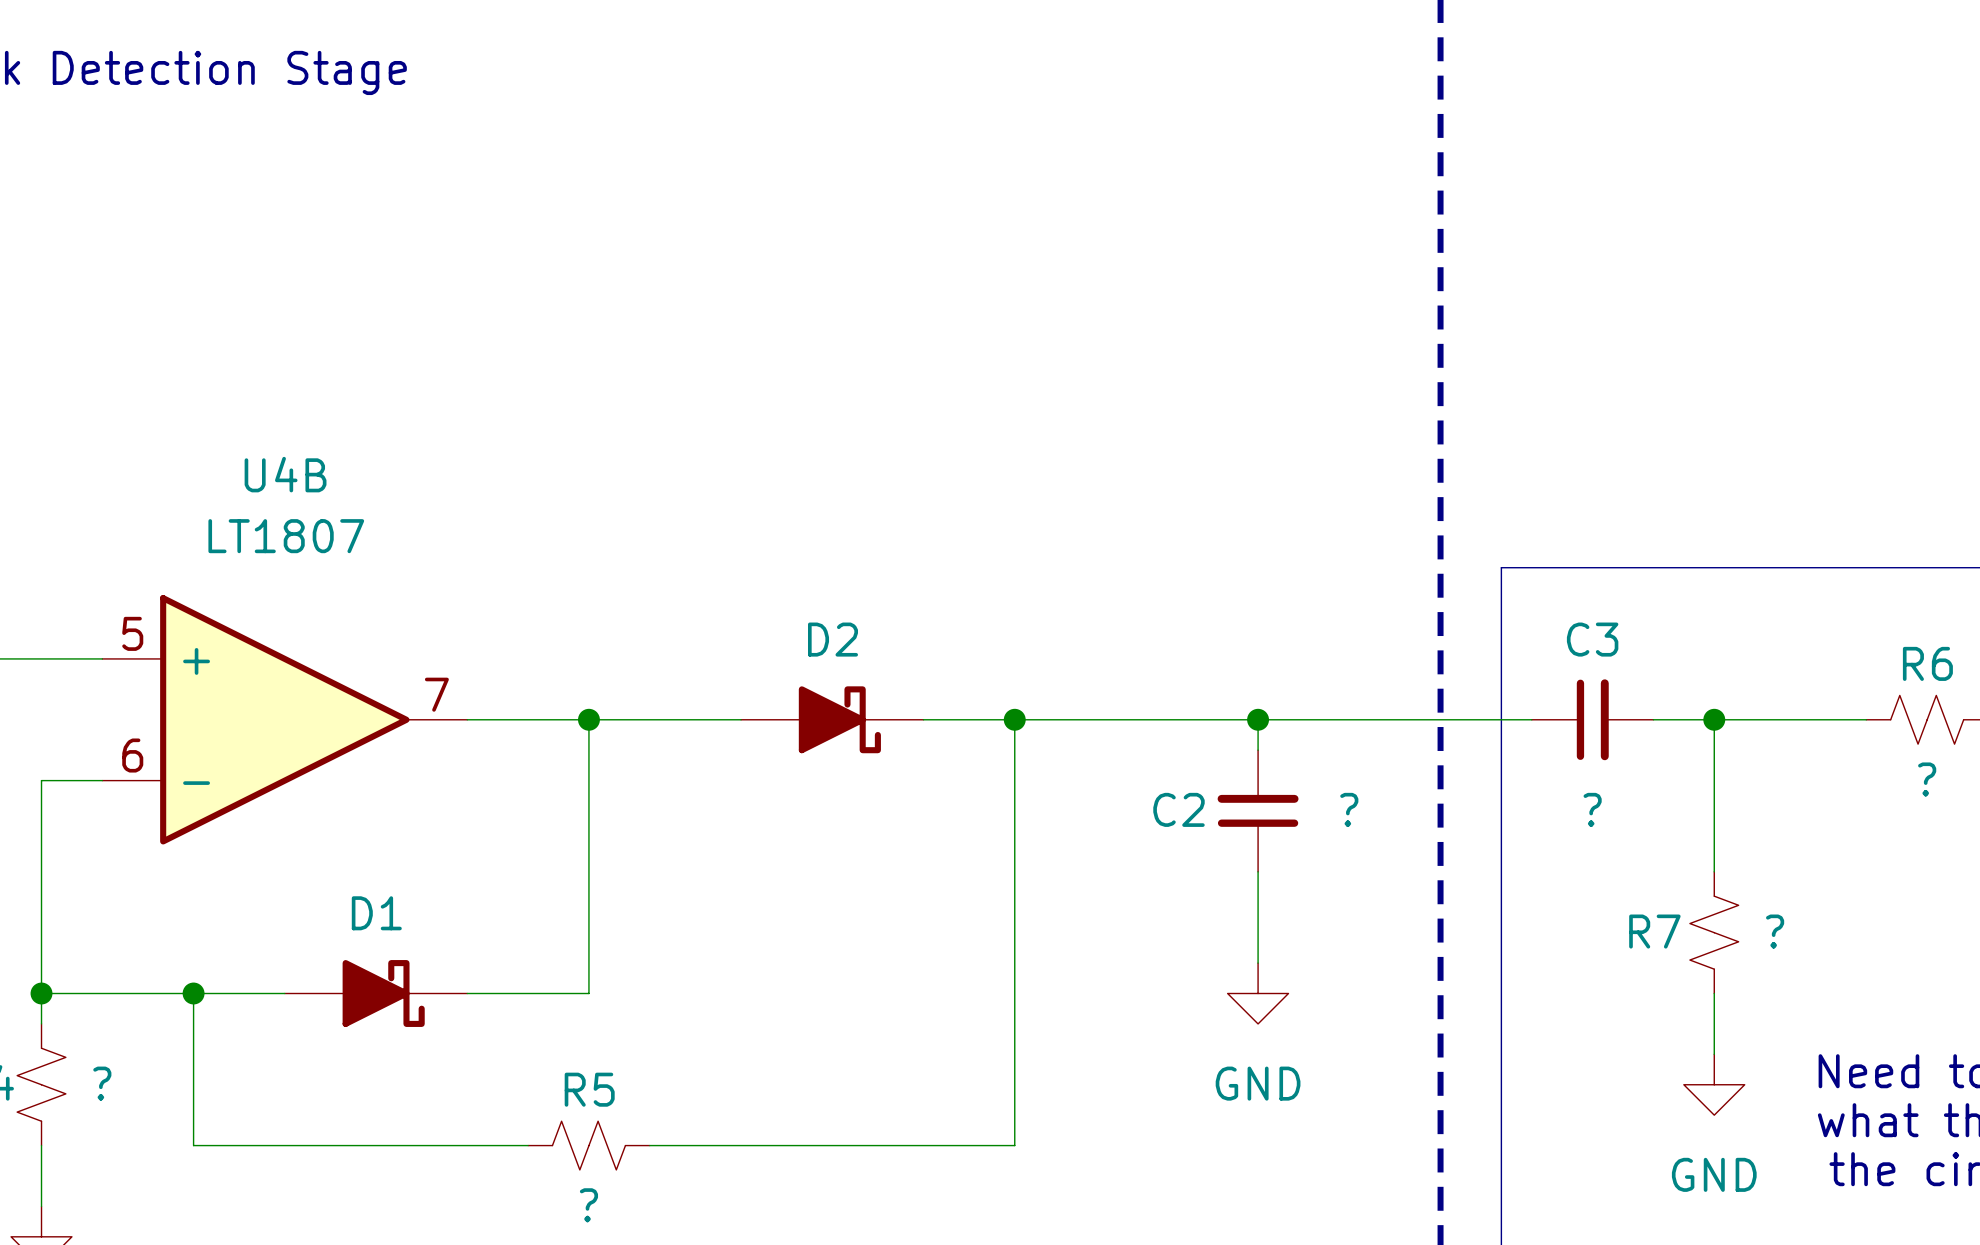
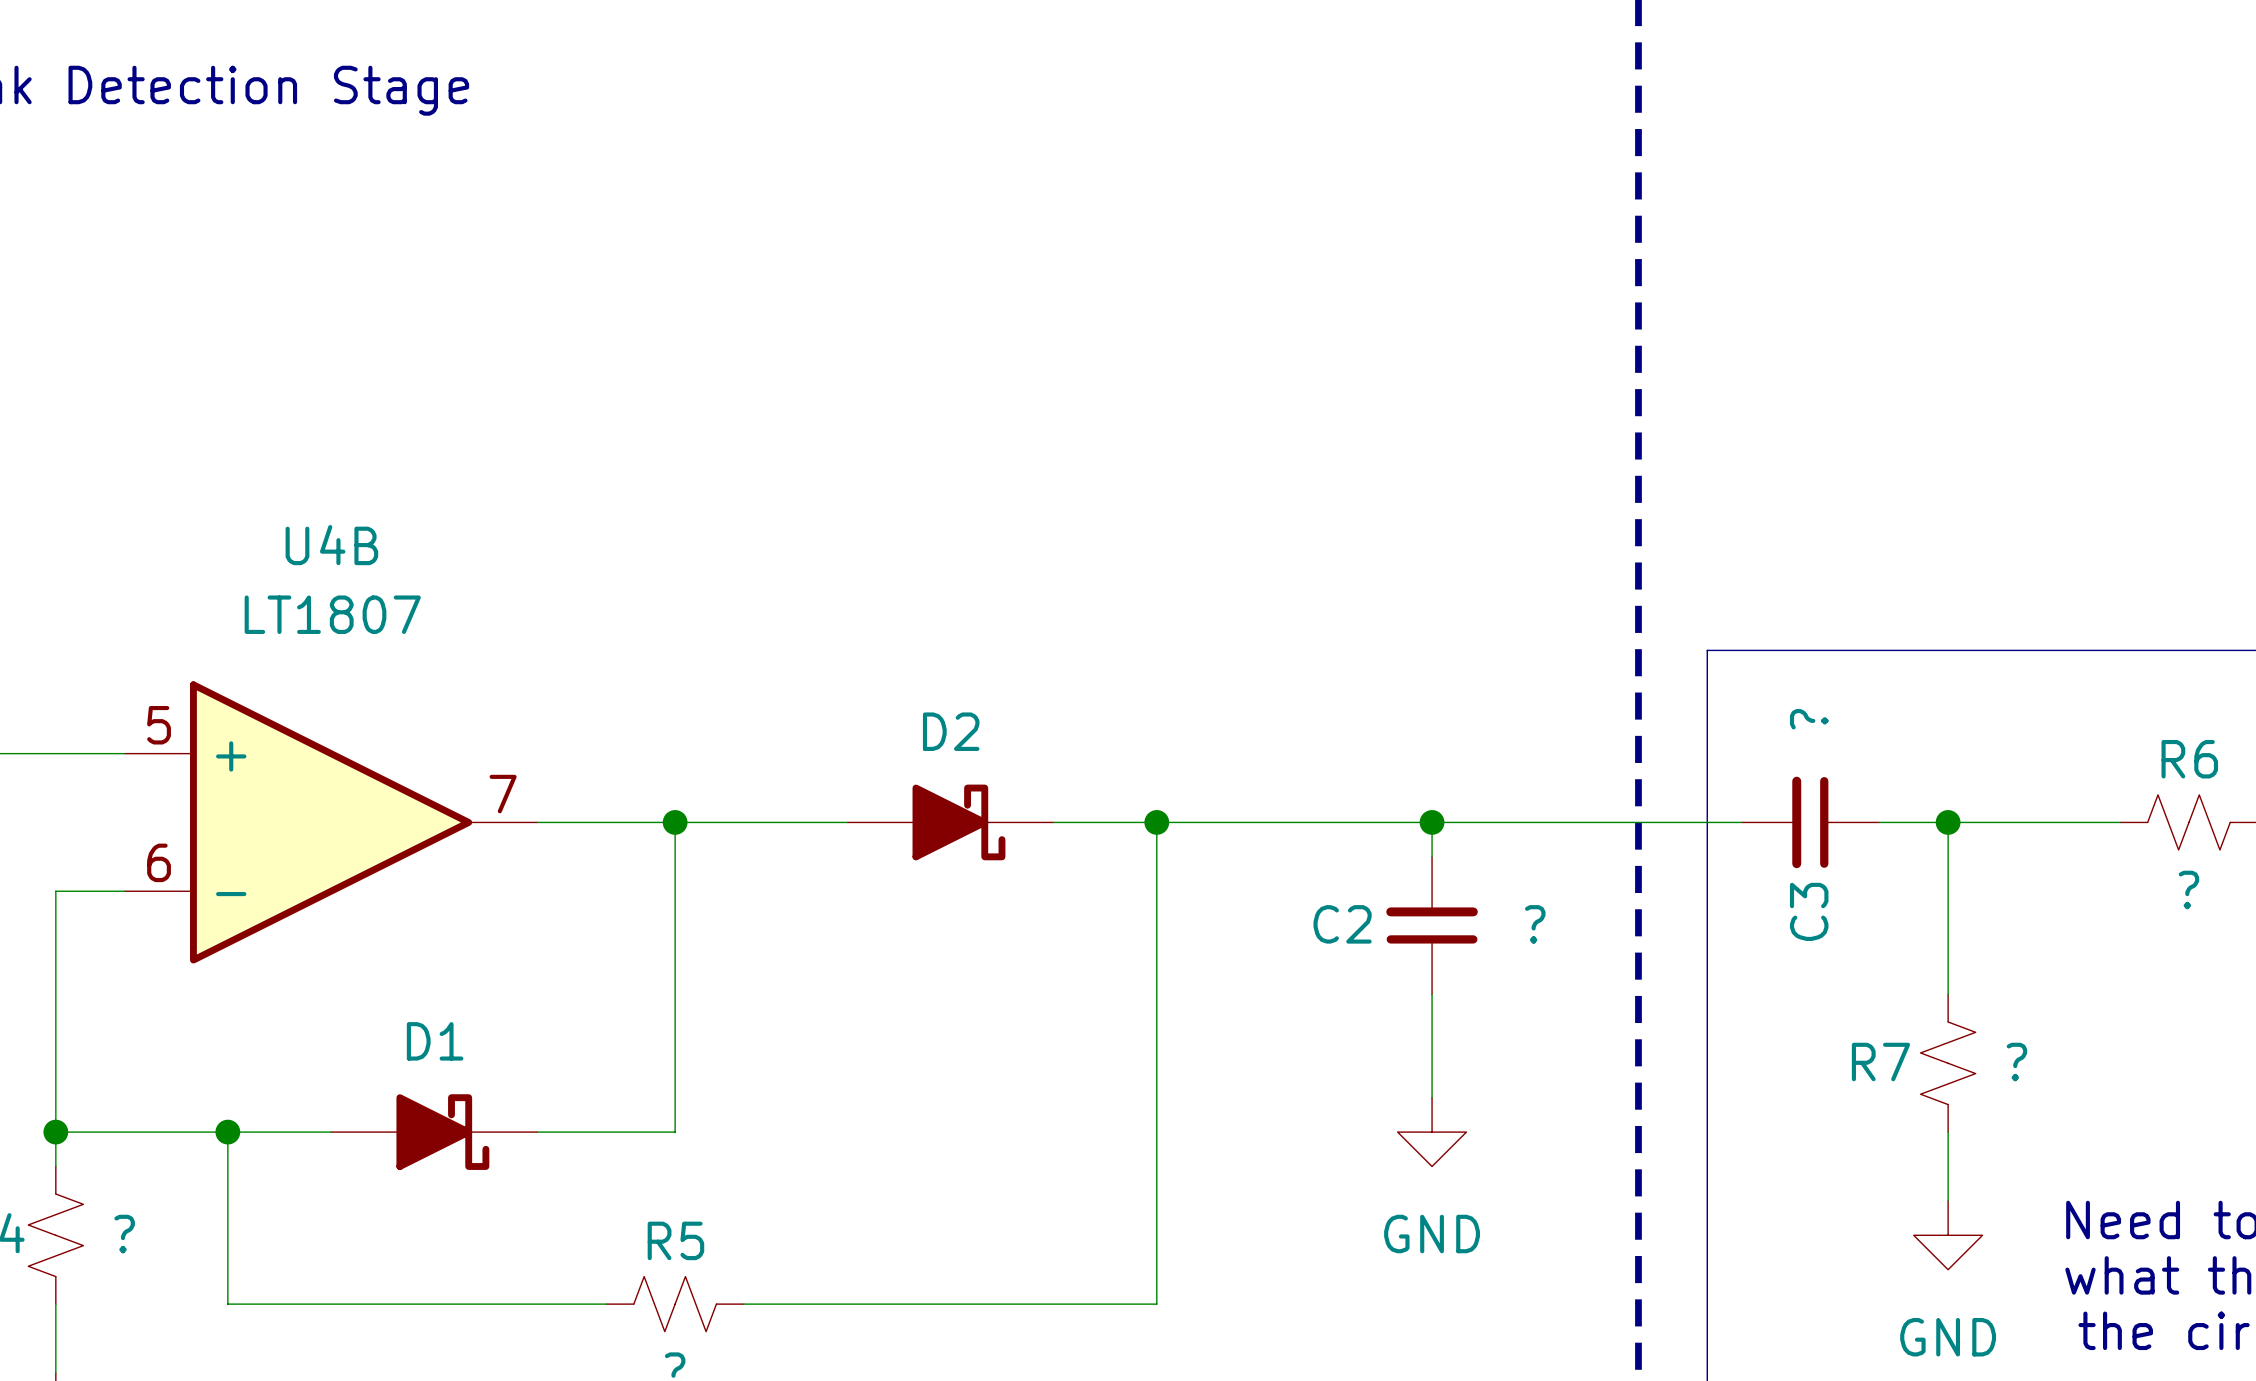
C3 rotation: 0° (1592, 719) -> 180° (1810, 822)

